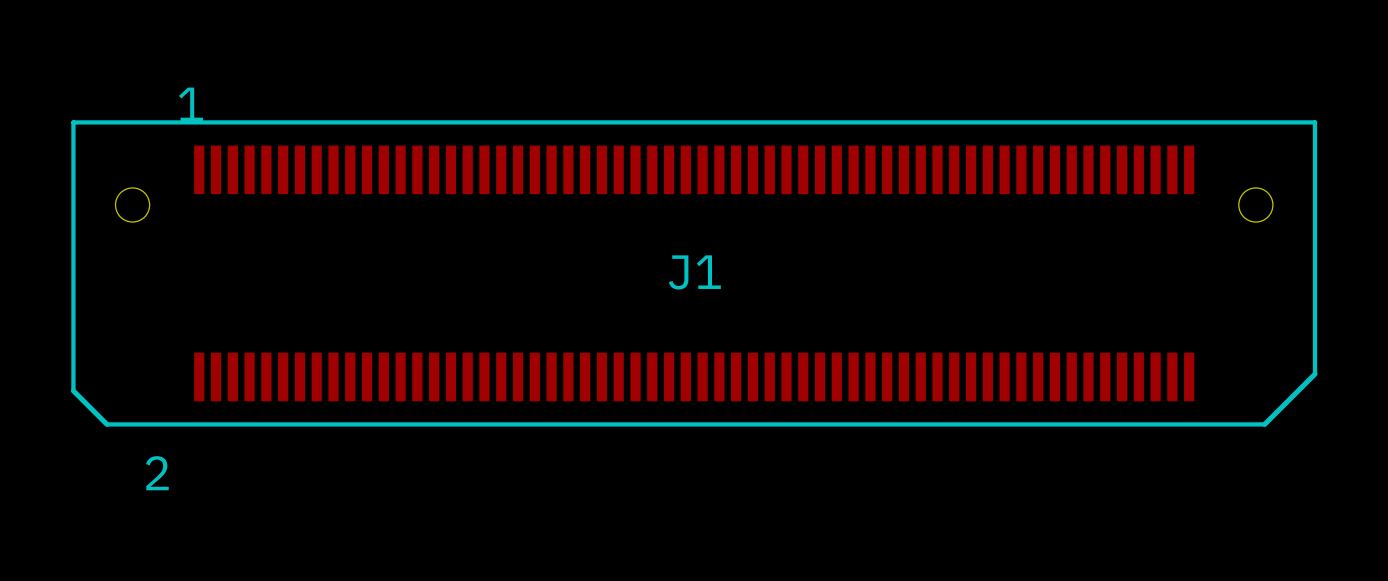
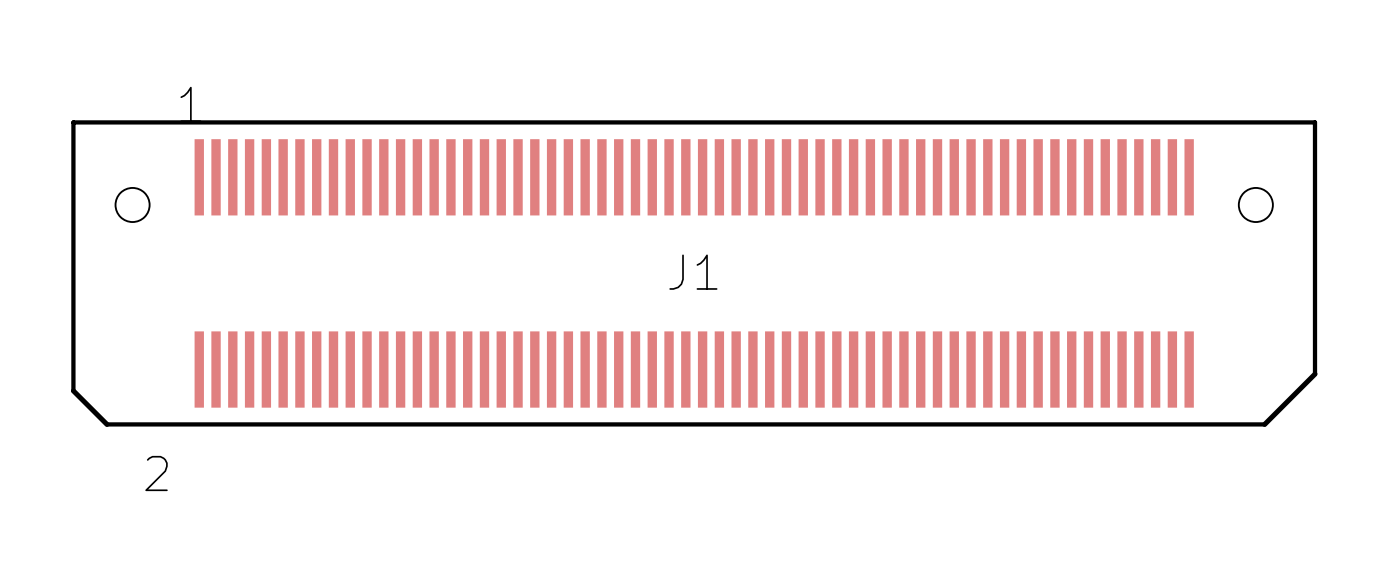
J1 footprint: [70, 120, 1318, 427] -> [70, 120, 1318, 427]

